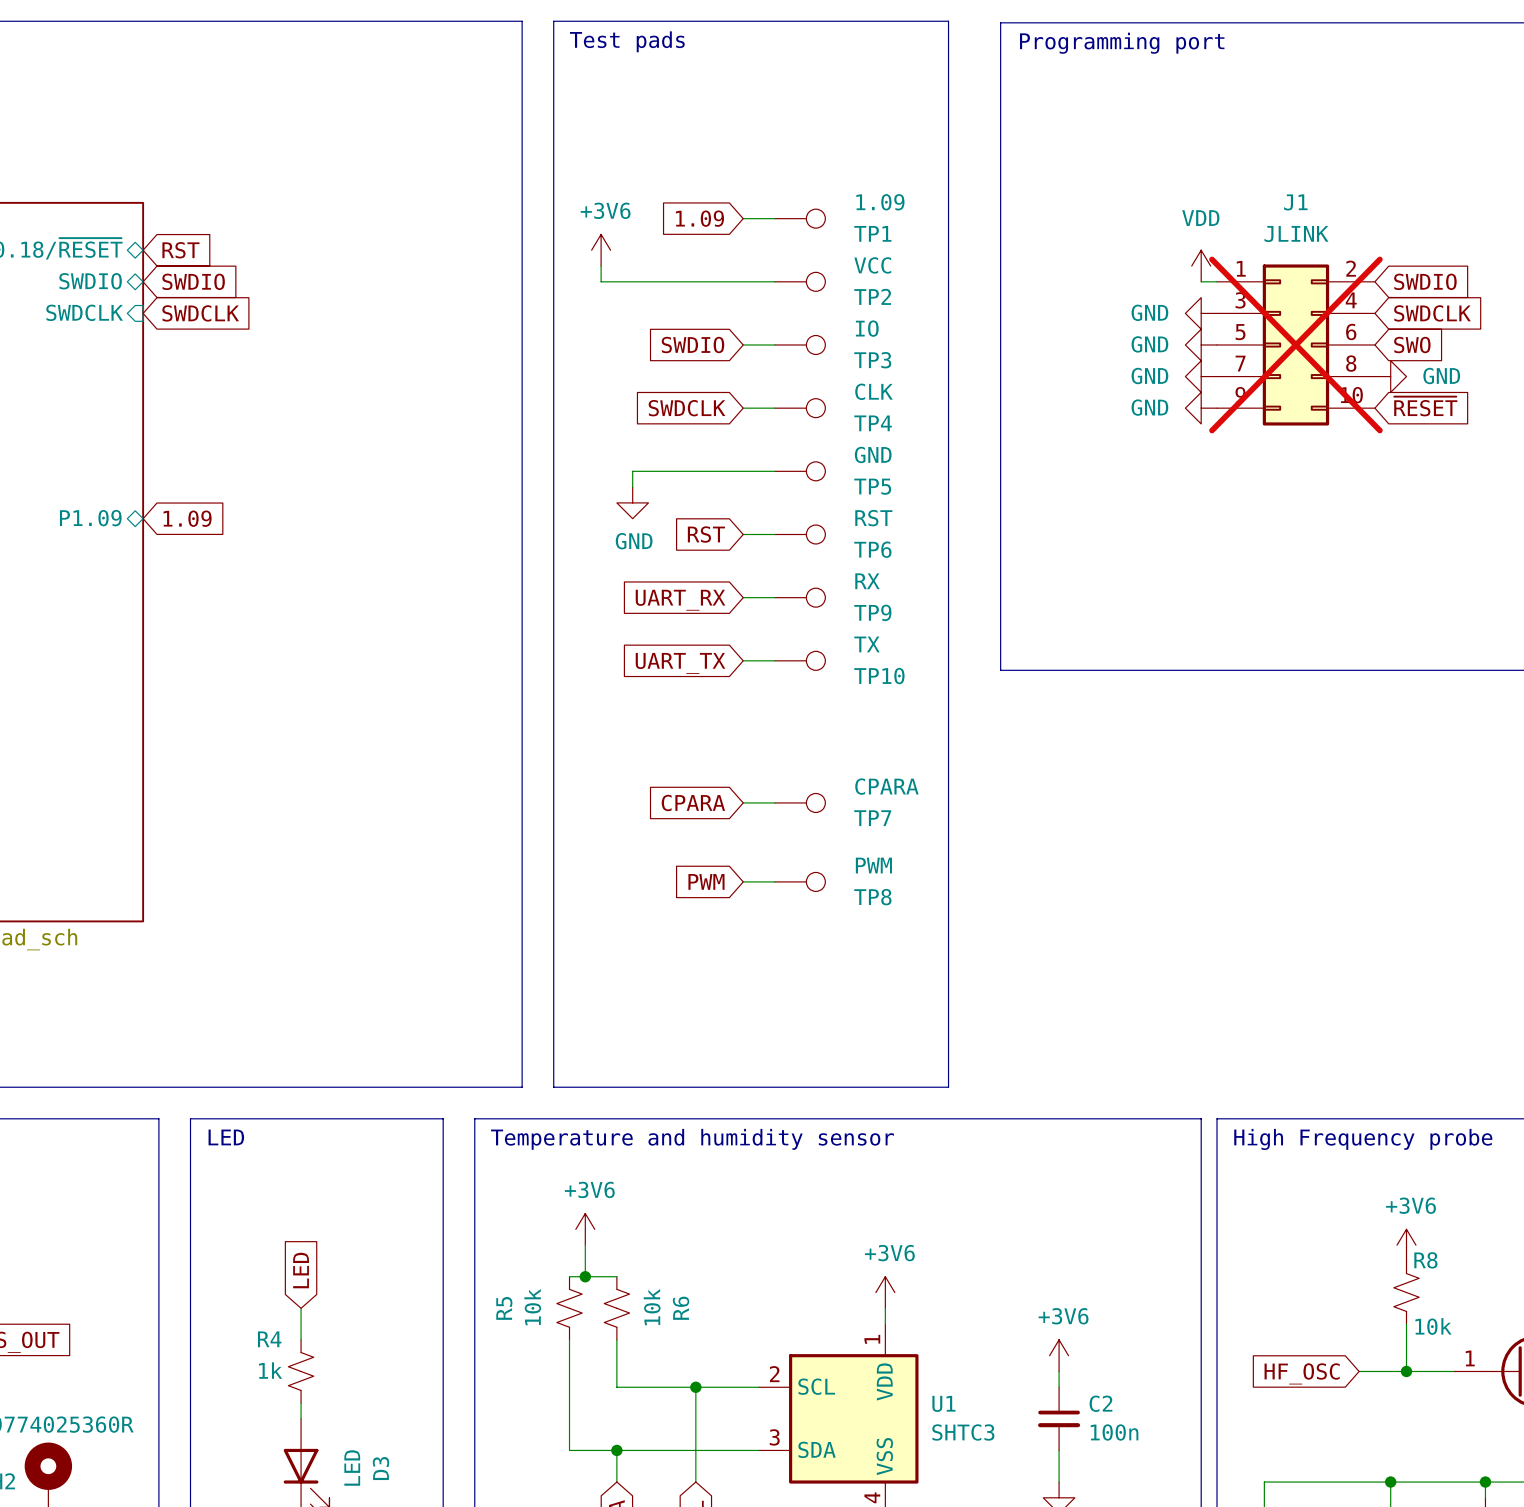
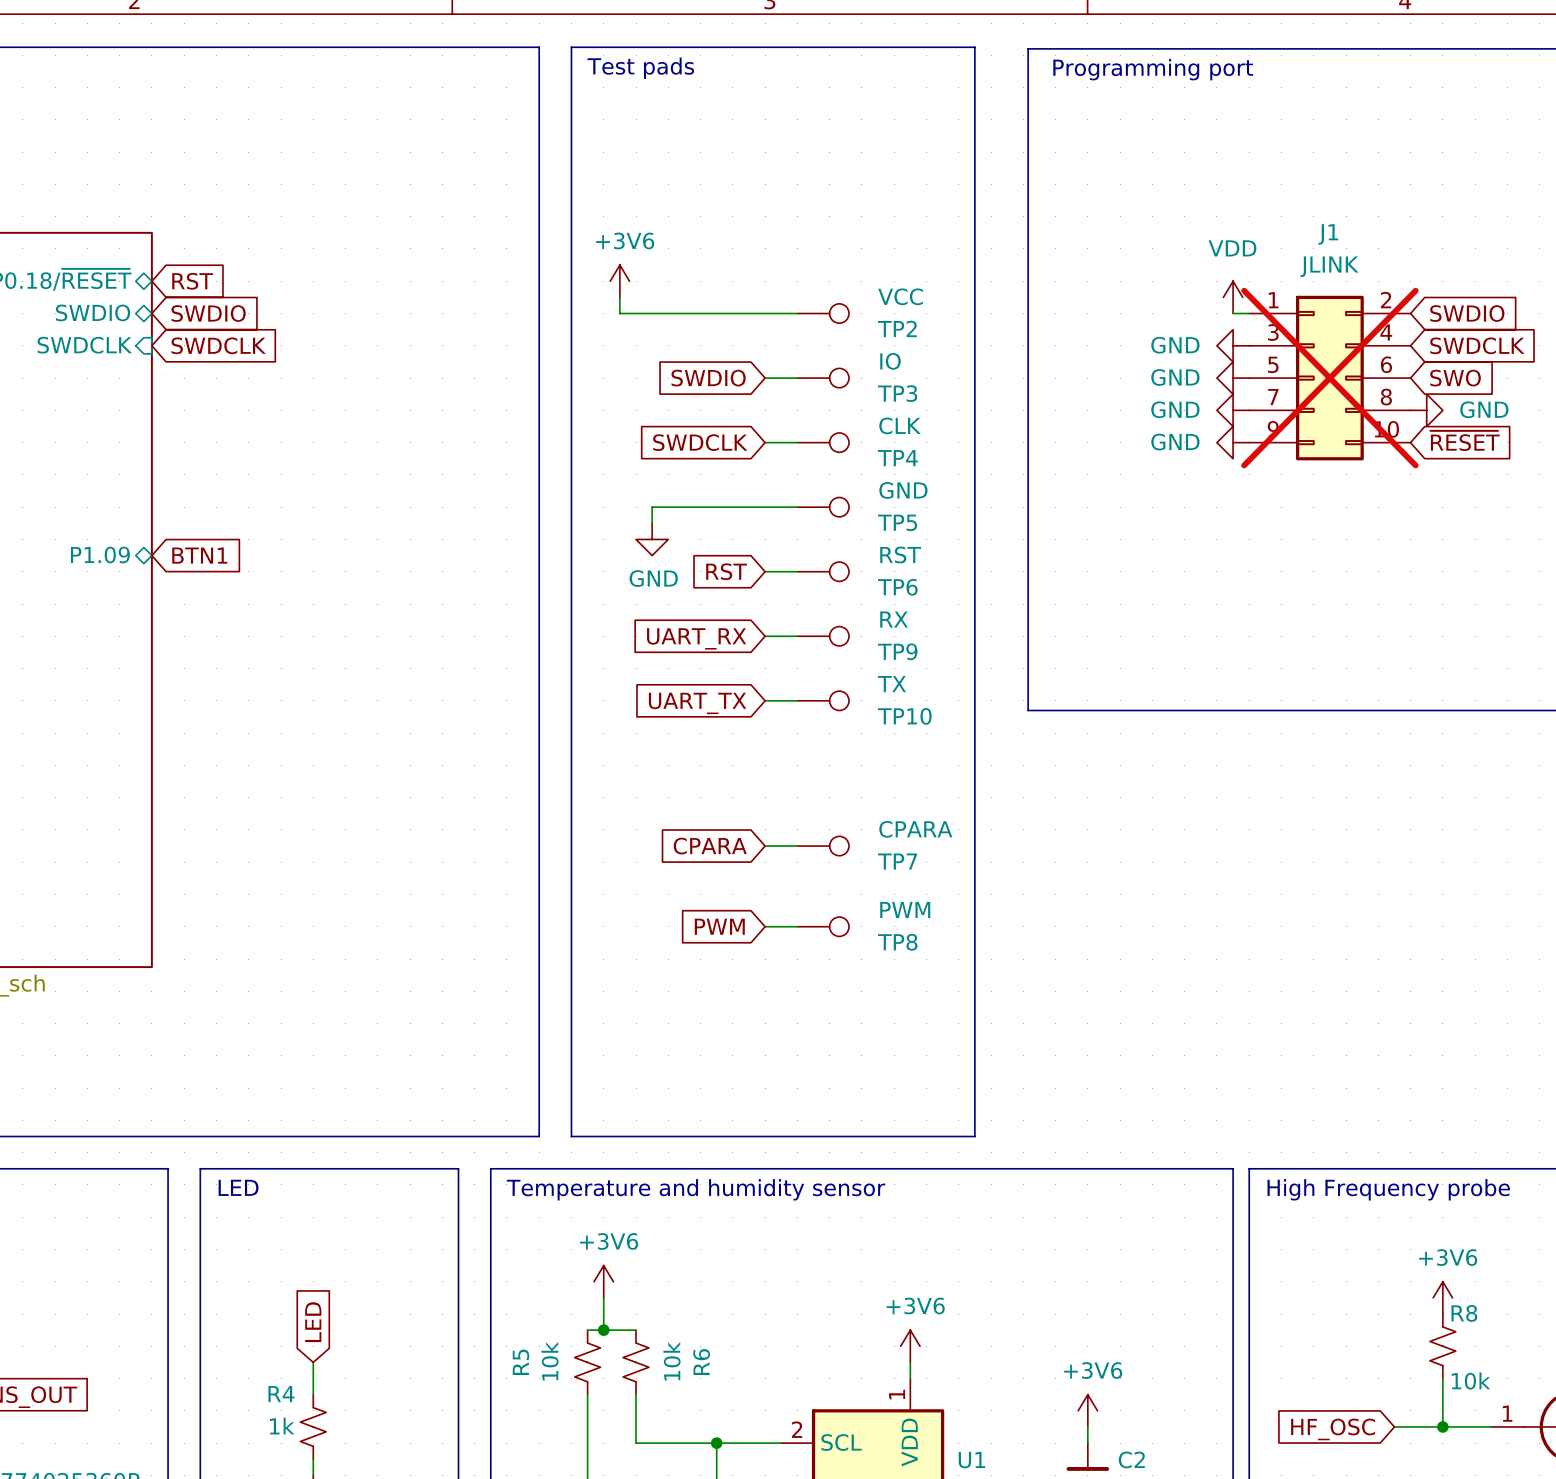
global label: 1.09 (699, 218) -> none
wire: (743, 218) (774, 218) -> none
TP1: 1.09 (800, 218) -> none
global label: 1.09 (187, 518) -> BTN1 (199, 555)

